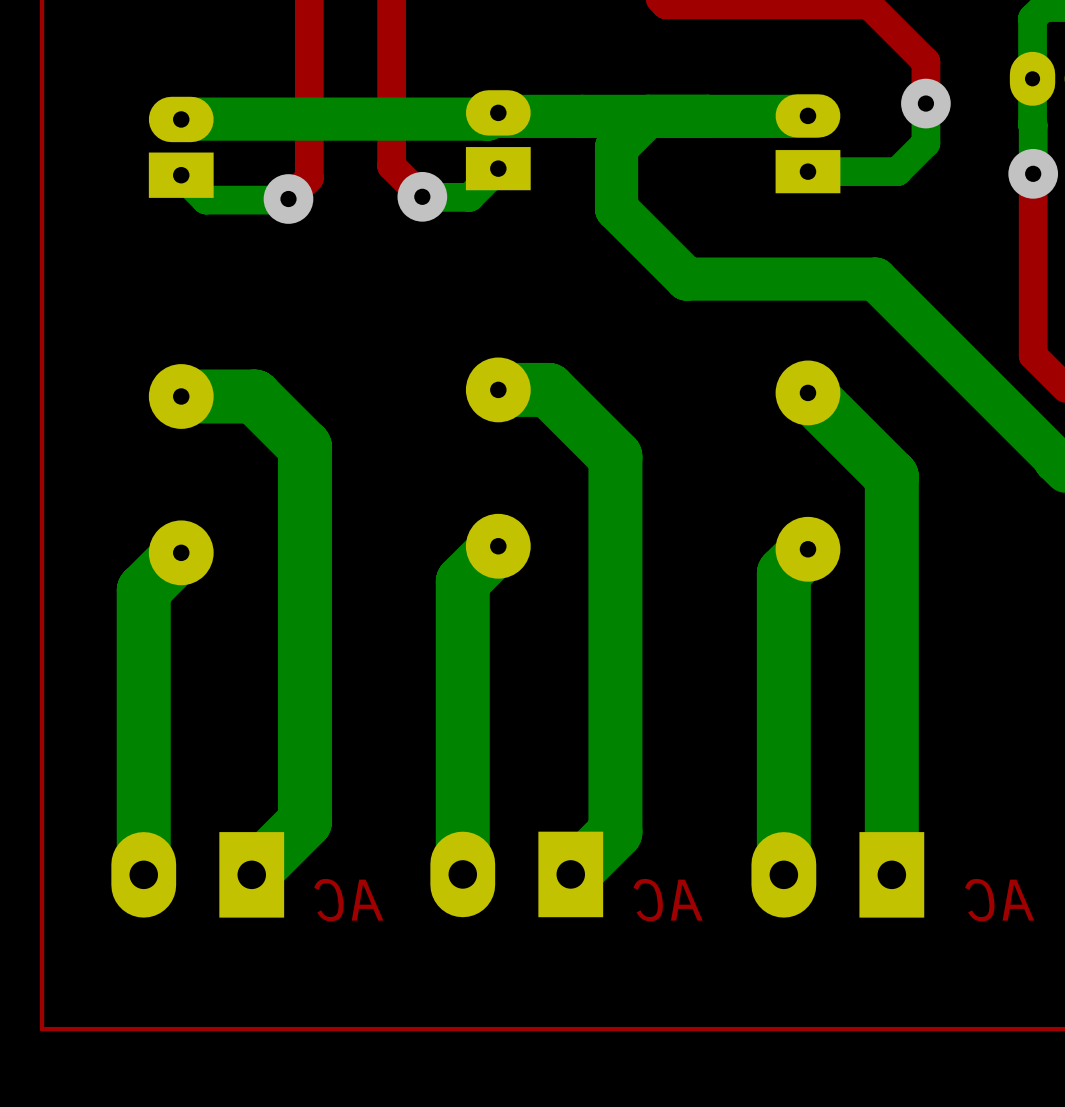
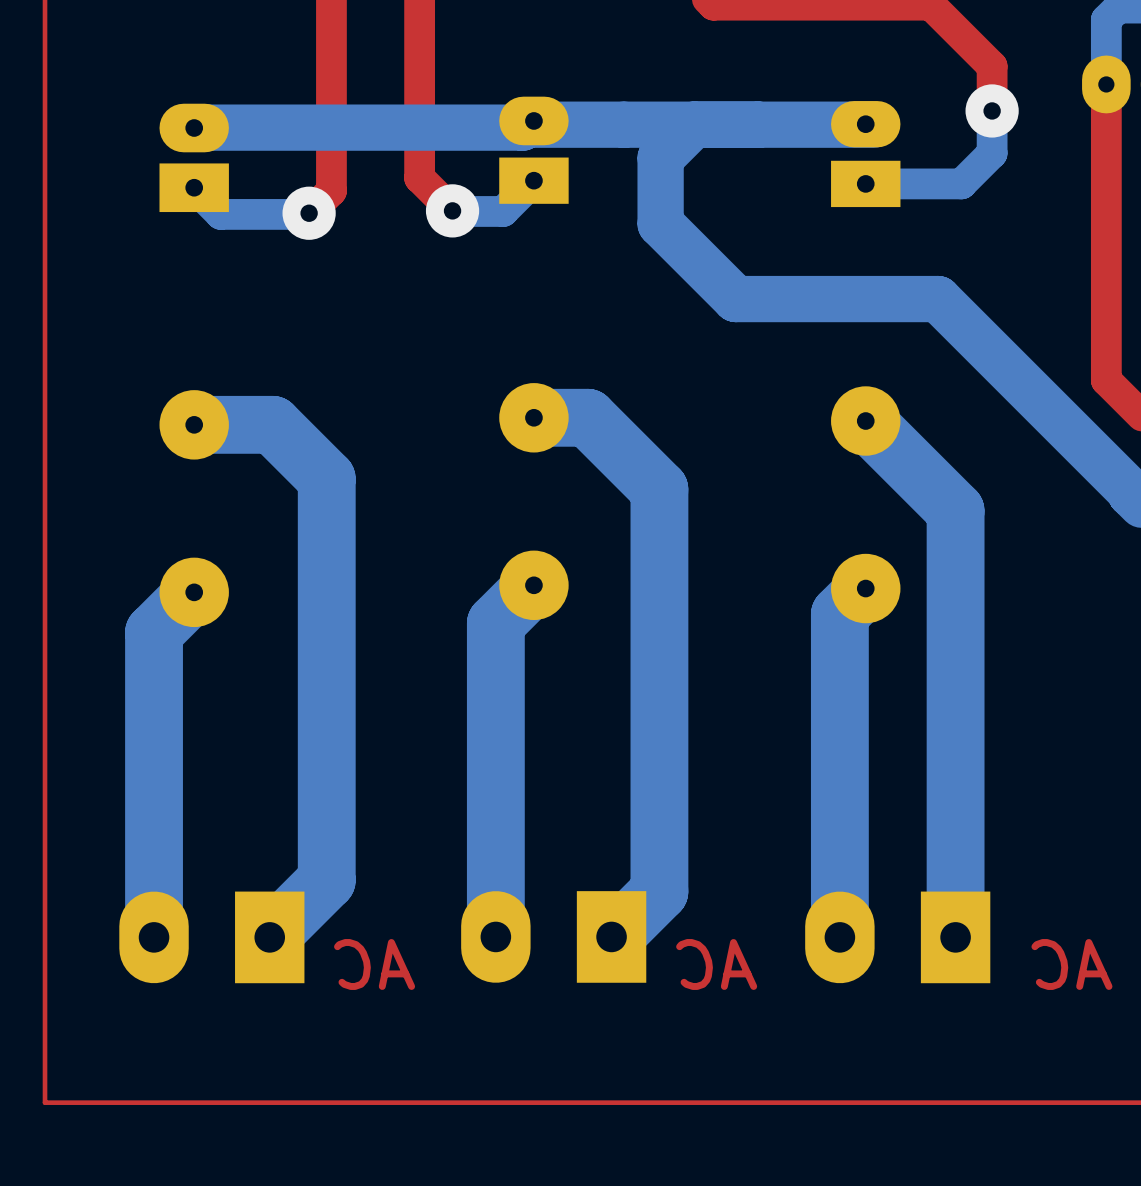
bottom track: (1032, 78) (1033, 173) -> none
top track: (1033, 173) (1033, 355) -> (1106, 84) (1107, 381)
via: (1033, 173) -> none

